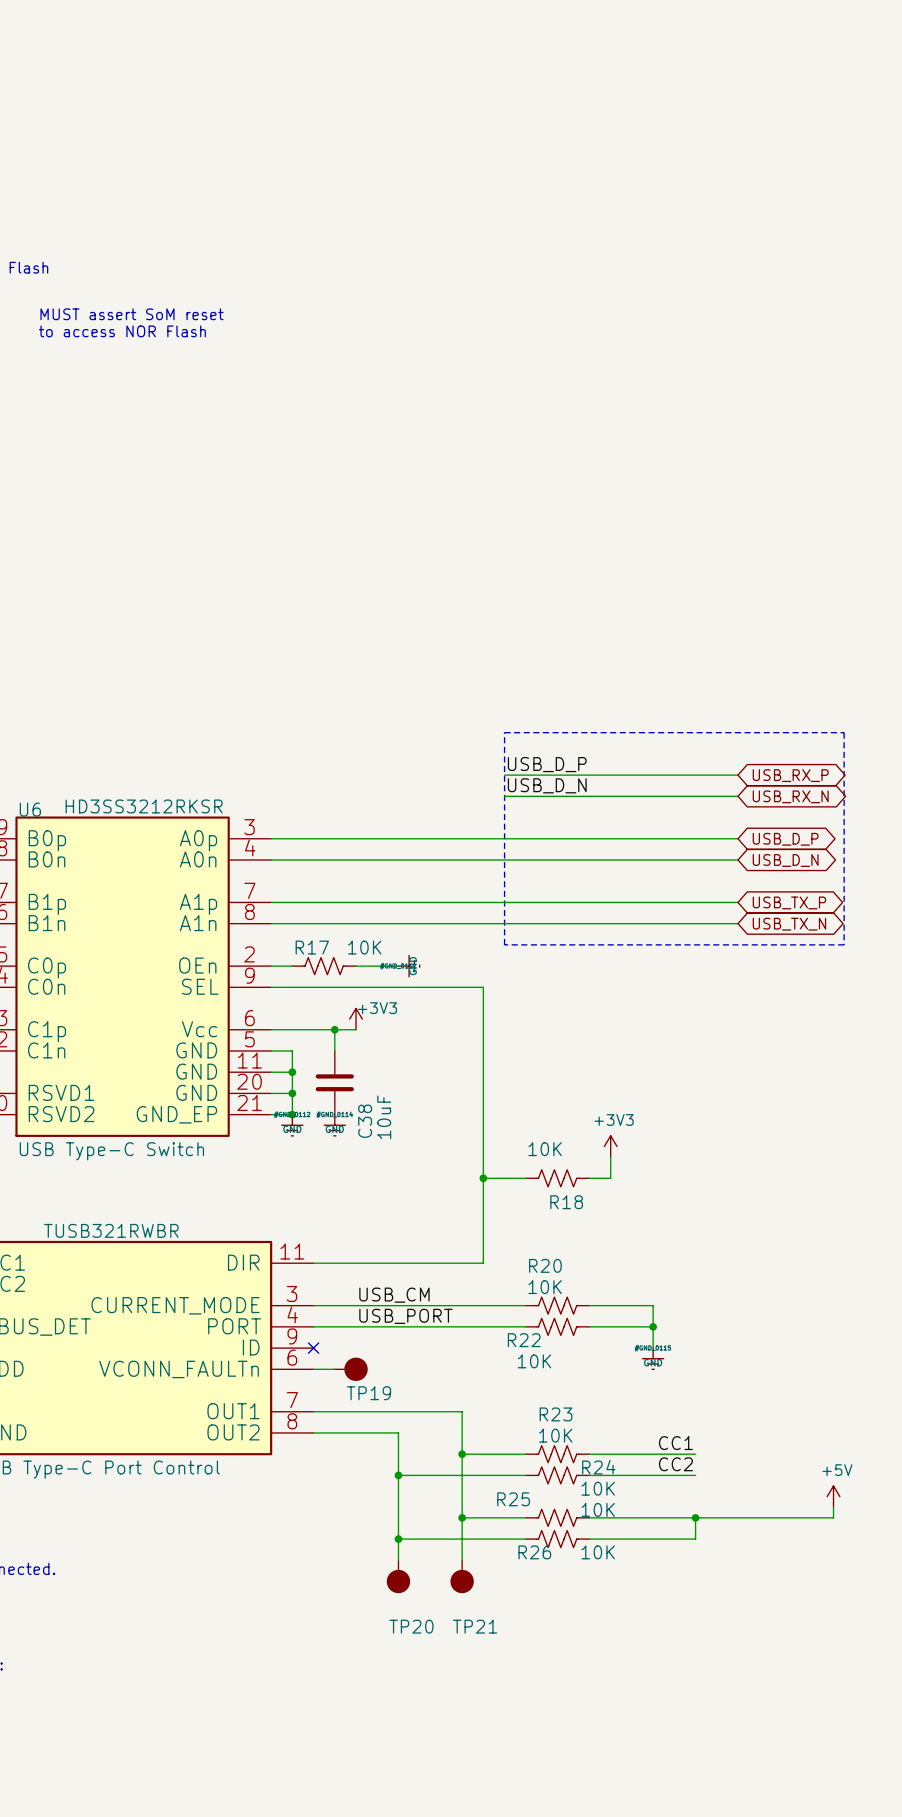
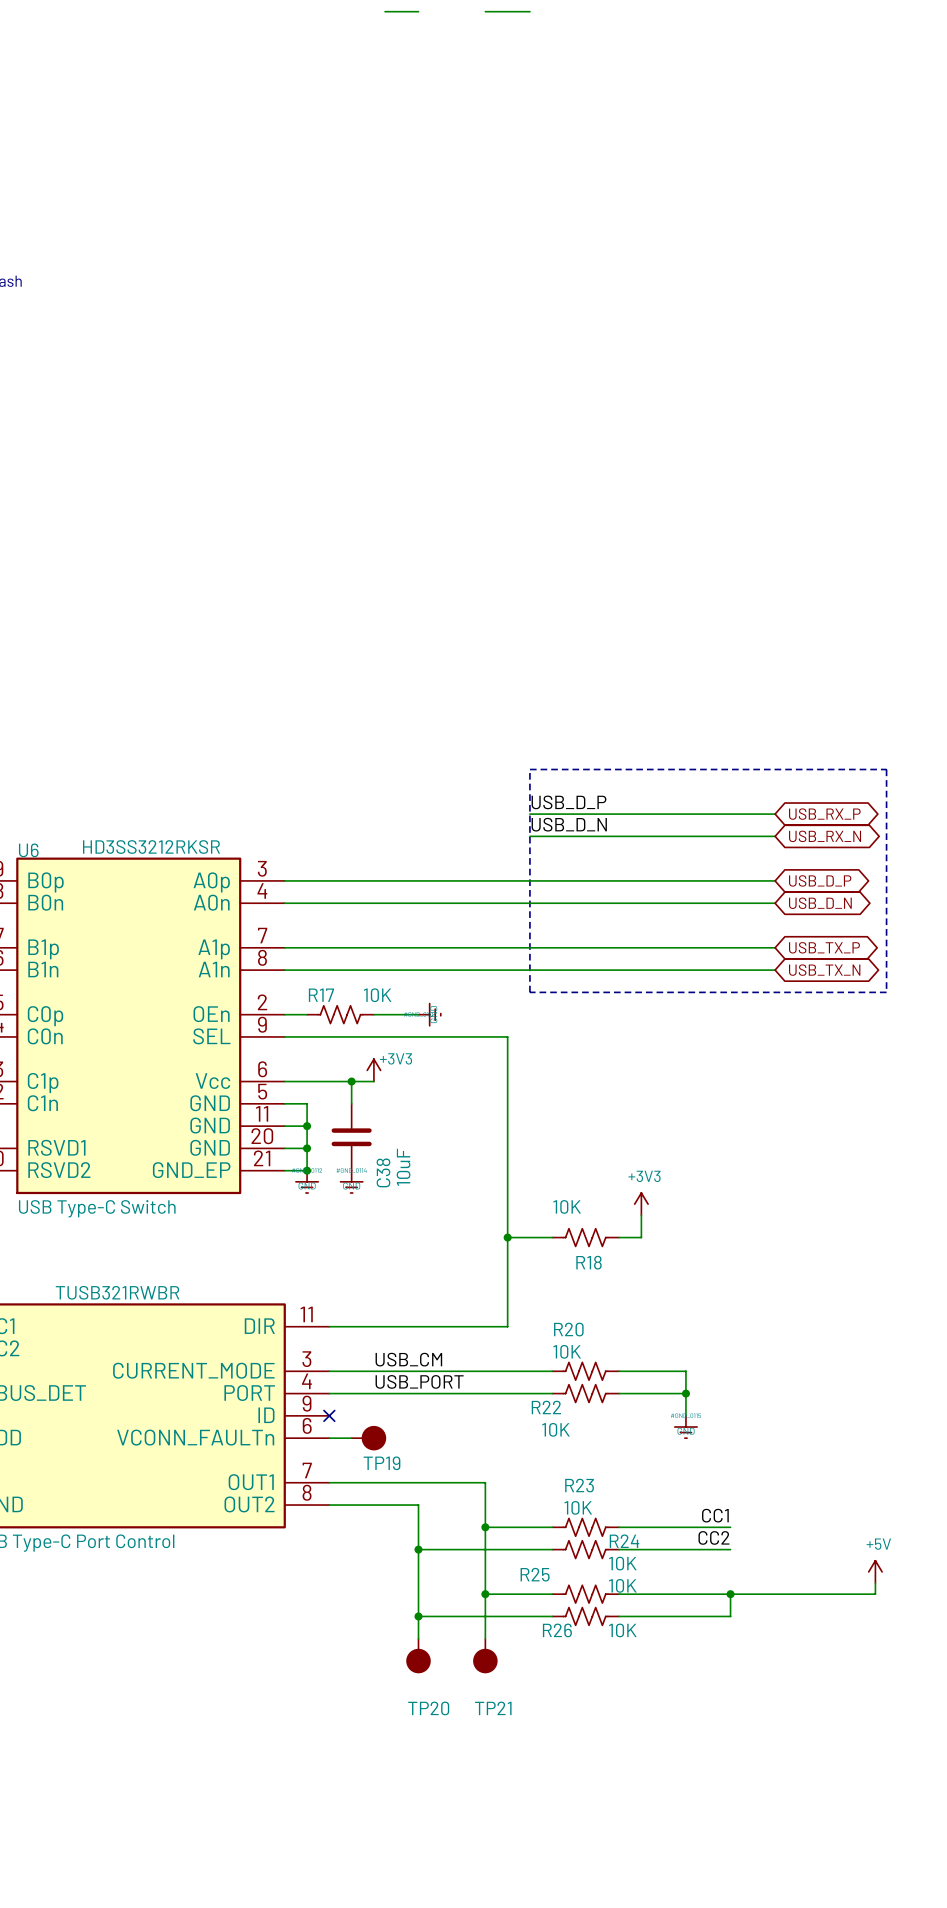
wire: none -> (385, 11) (418, 11)
wire: none -> (485, 11) (529, 11)
text: MUST assert SoM reset (132, 314) -> none
text: to access NOR Flash (122, 331) -> none

